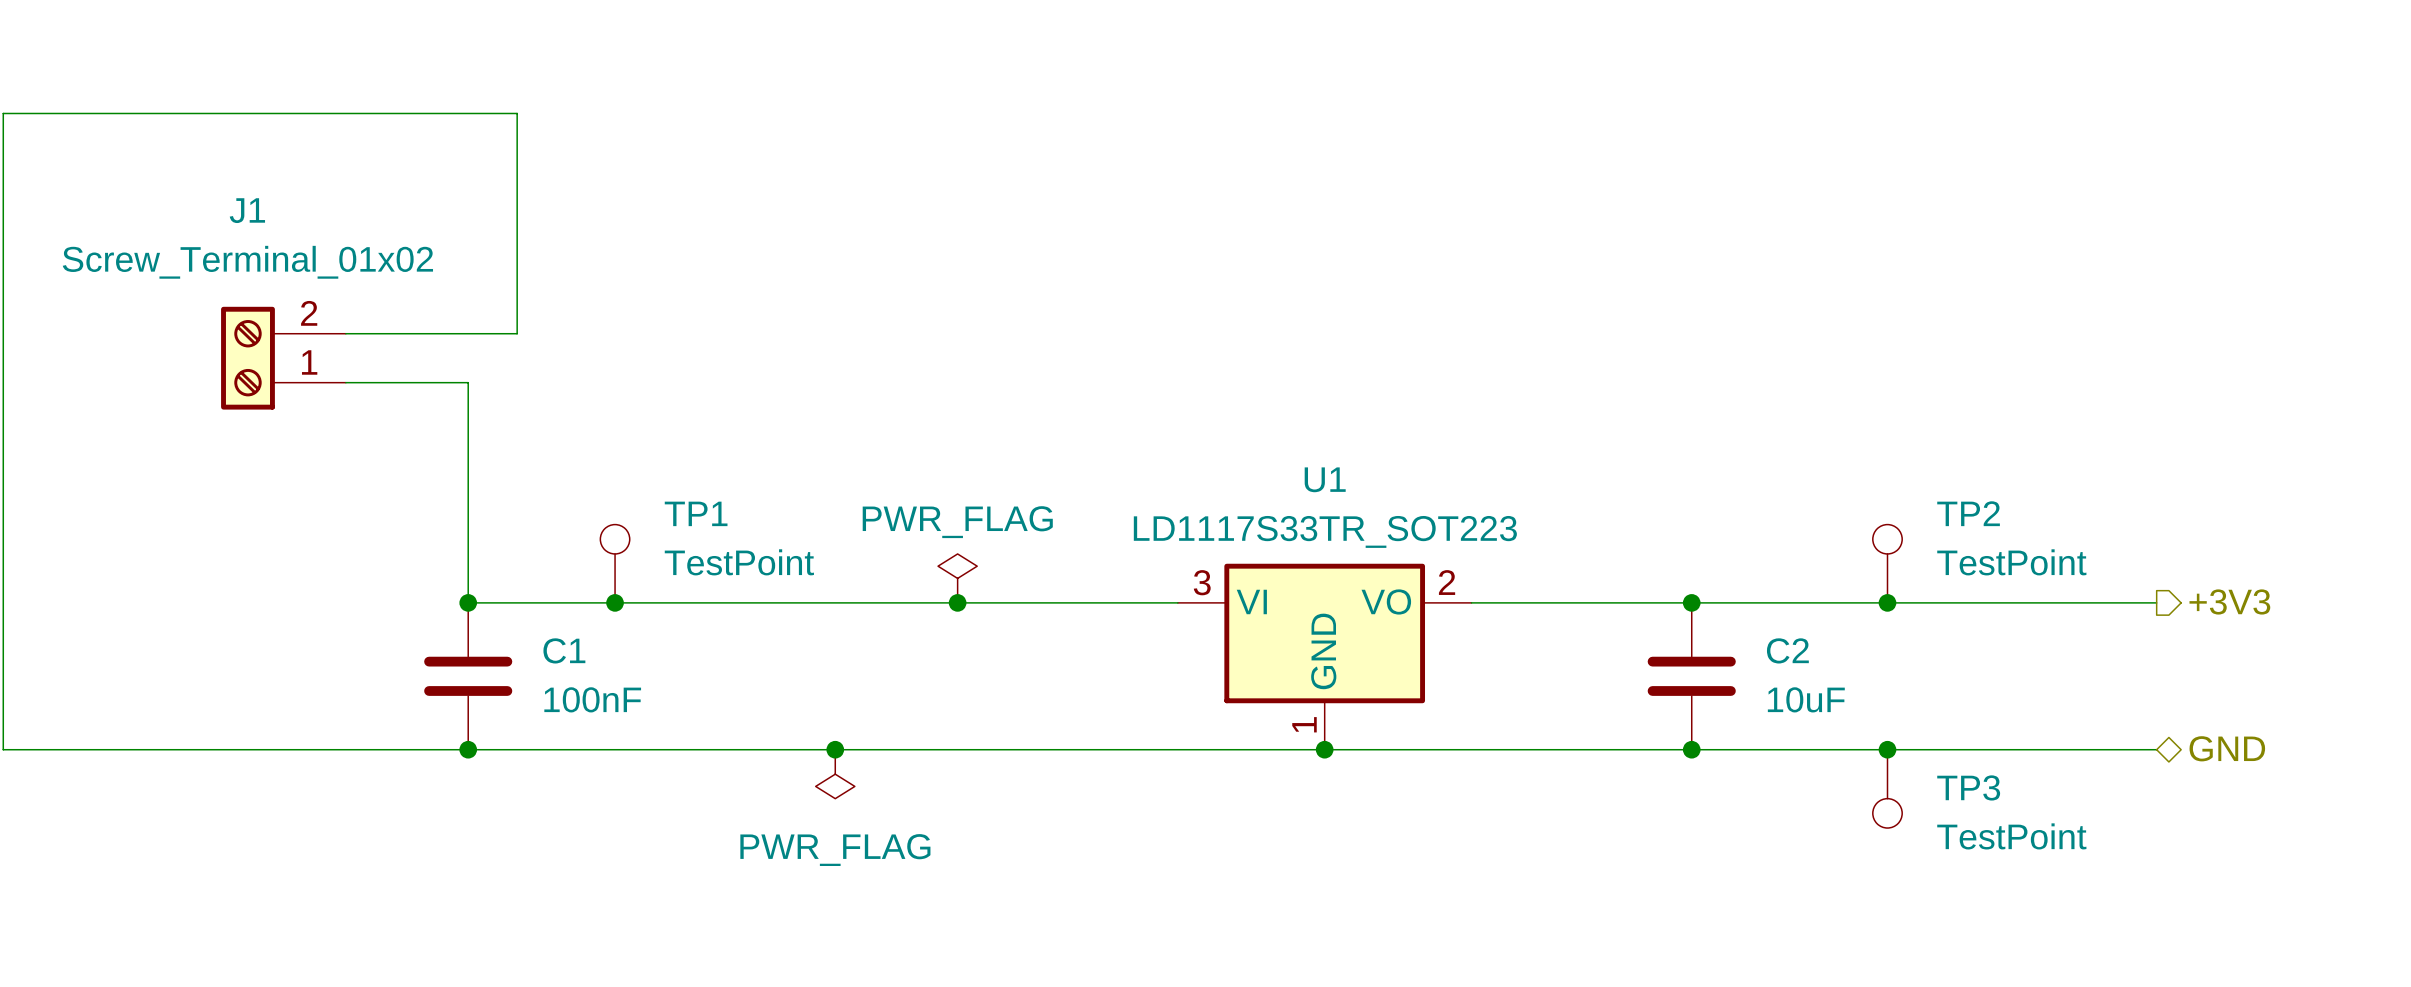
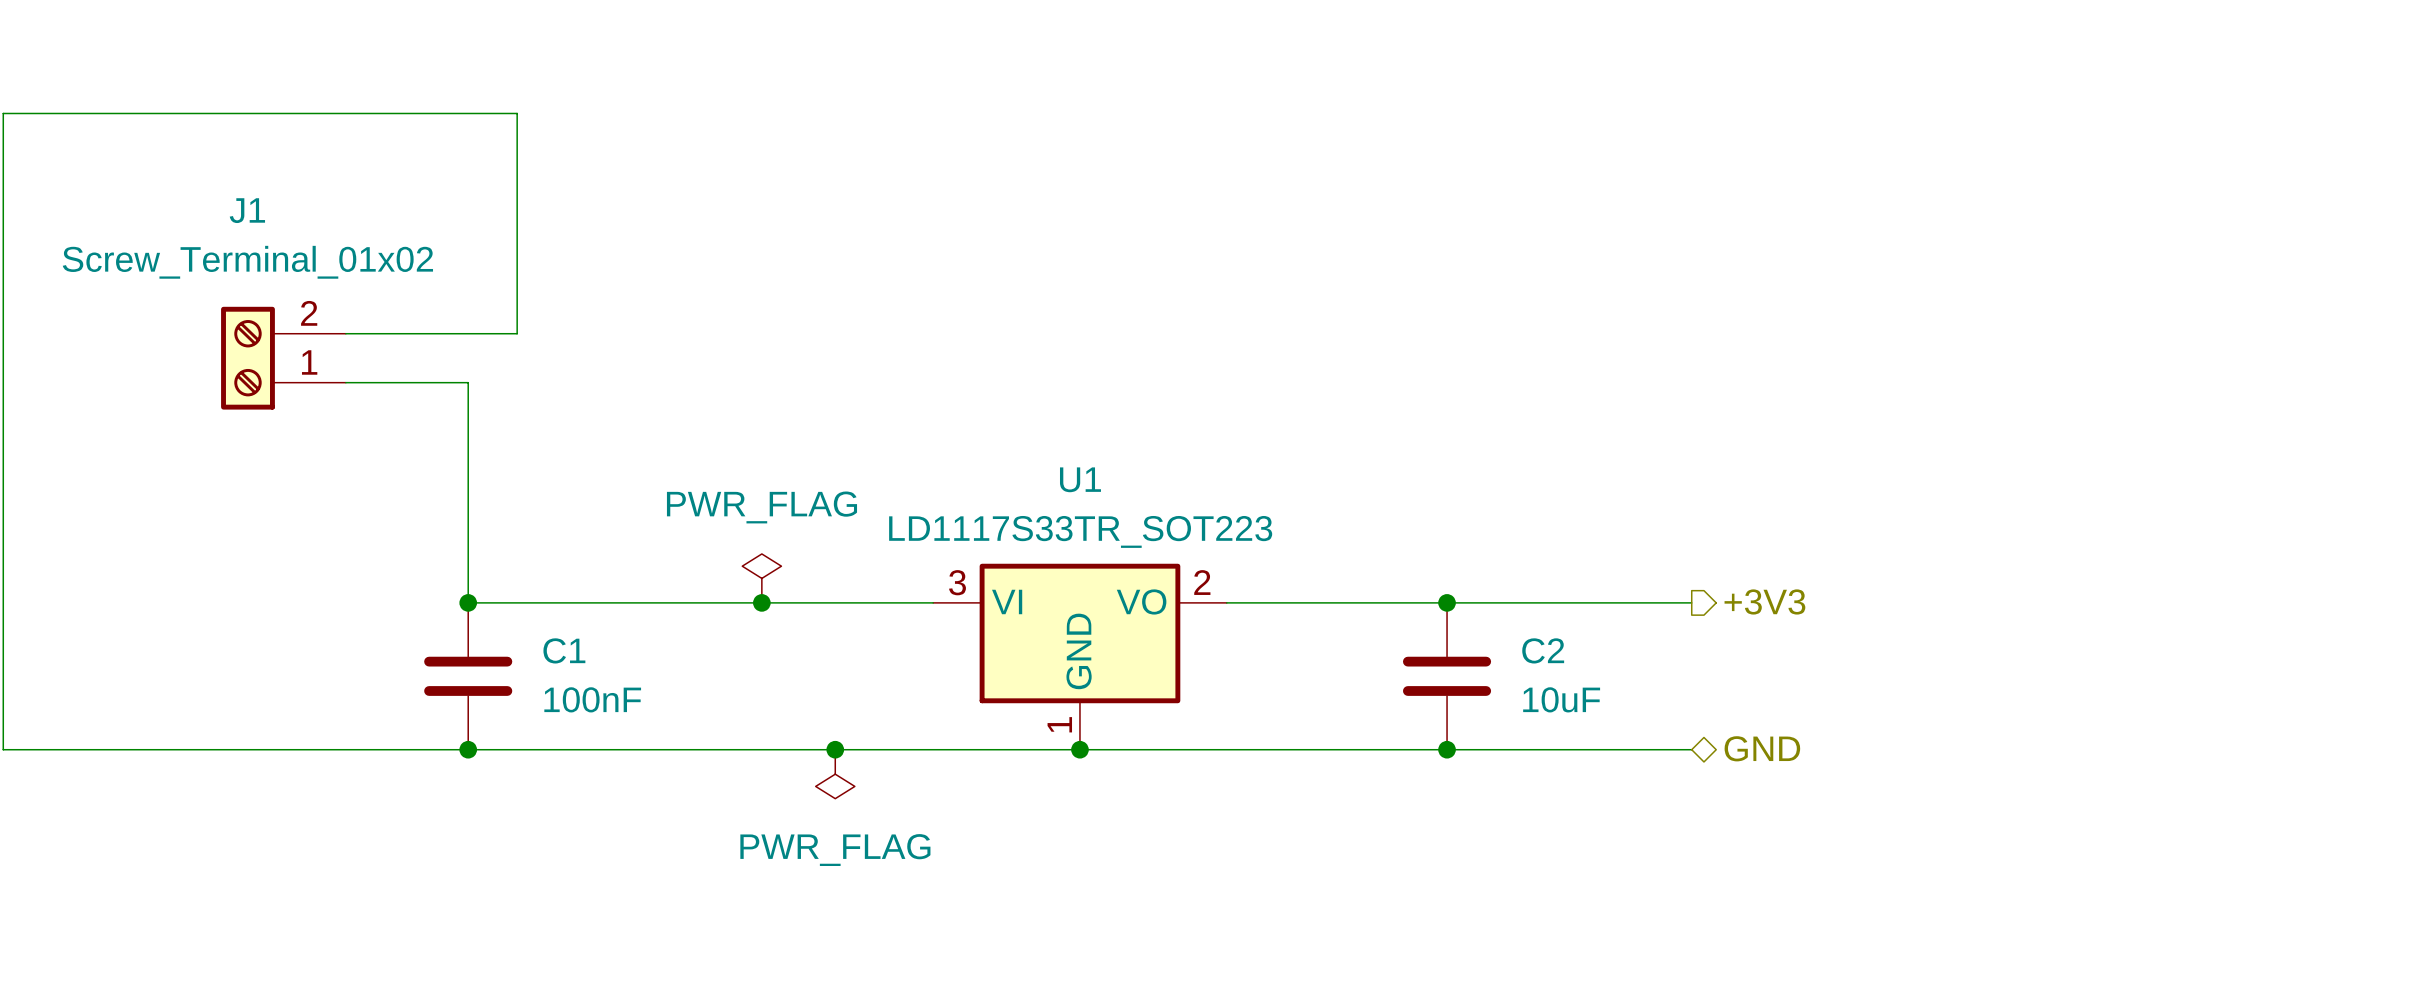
power symbol text position: PWR_FLAG (957, 522) -> PWR_FLAG (761, 507)
TP1: TestPoint (615, 563) -> none
TP2: TestPoint (1887, 563) -> none
power symbol position: PWR_FLAG (957, 578) -> PWR_FLAG (761, 578)
hierarchical label position: +3V3 (2229, 601) -> +3V3 (1764, 601)
junction: (615, 602) -> none
junction: none -> (761, 602)
junction: (957, 602) -> none
junction: none -> (1447, 602)
wire: (1691, 602) (2156, 602) -> none
junction: (1691, 602) -> none
junction: (1887, 602) -> none
U1 position: (1324, 656) -> (1079, 656)
C2 position: (1691, 676) -> (1447, 676)
hierarchical label position: GND (2227, 748) -> GND (1762, 748)
junction: none -> (1079, 749)
junction: (1324, 749) -> none
junction: none -> (1447, 749)
wire: (1691, 749) (2156, 749) -> none
junction: (1691, 749) -> none
junction: (1887, 749) -> none
TP3: TestPoint (1887, 788) -> none

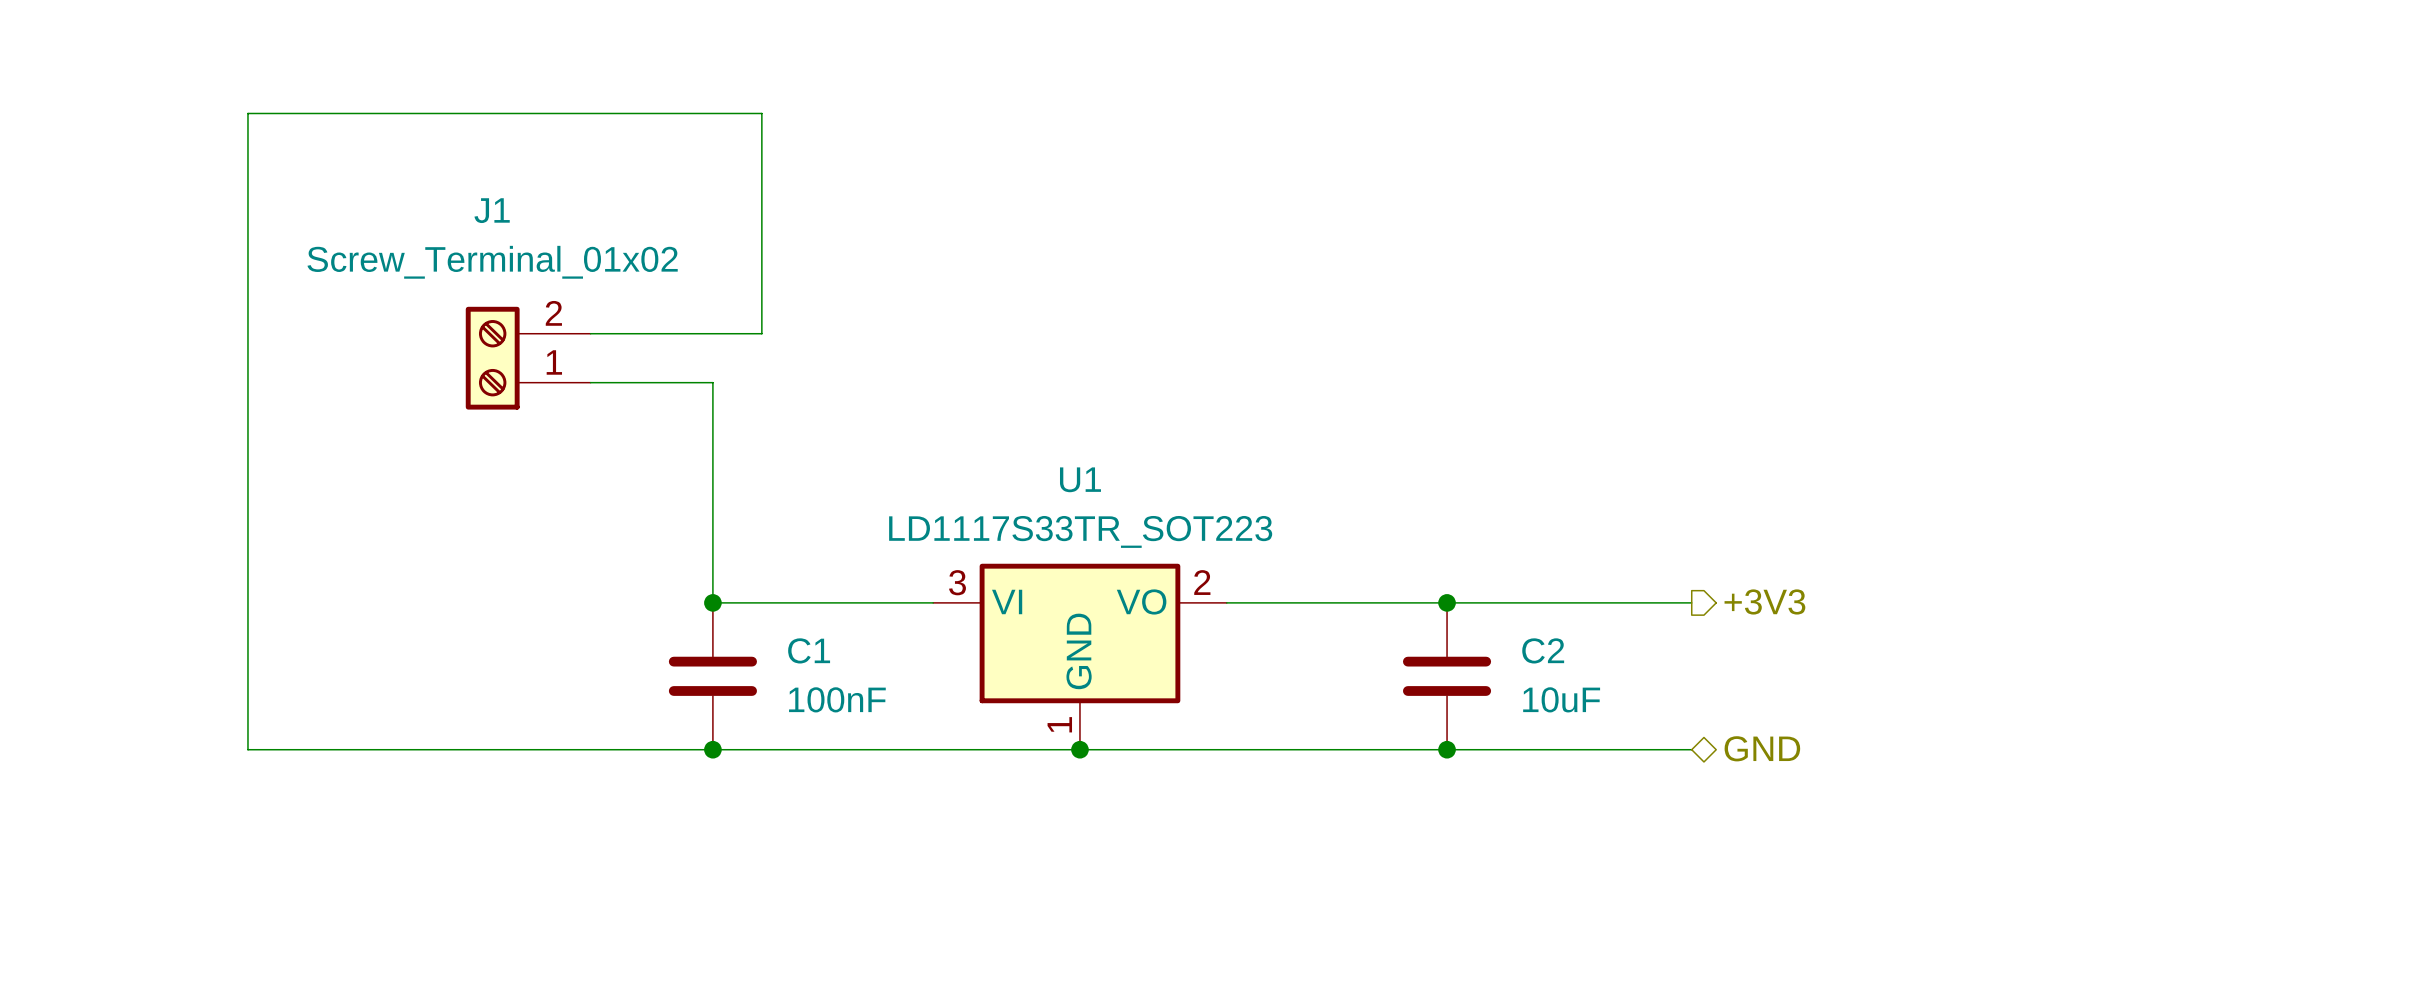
wire: (247, 113) (3, 113) (3, 749) (247, 749) -> (247, 113) (247, 749)
wire: (517, 113) (517, 333) (345, 333) -> (517, 113) (761, 113) (761, 333) (590, 333)
J1 position: (283, 358) -> (528, 358)
wire: (345, 382) (468, 382) (468, 602) (712, 602) -> (590, 382) (712, 382) (712, 602)
power symbol: PWR_FLAG (761, 578) -> none
junction: (468, 602) -> none
junction position: (761, 602) -> (712, 602)
C1 position: (468, 676) -> (712, 676)
junction: (468, 749) -> none
junction: none -> (712, 749)
junction: (835, 749) -> none
power symbol: PWR_FLAG (835, 774) -> none

